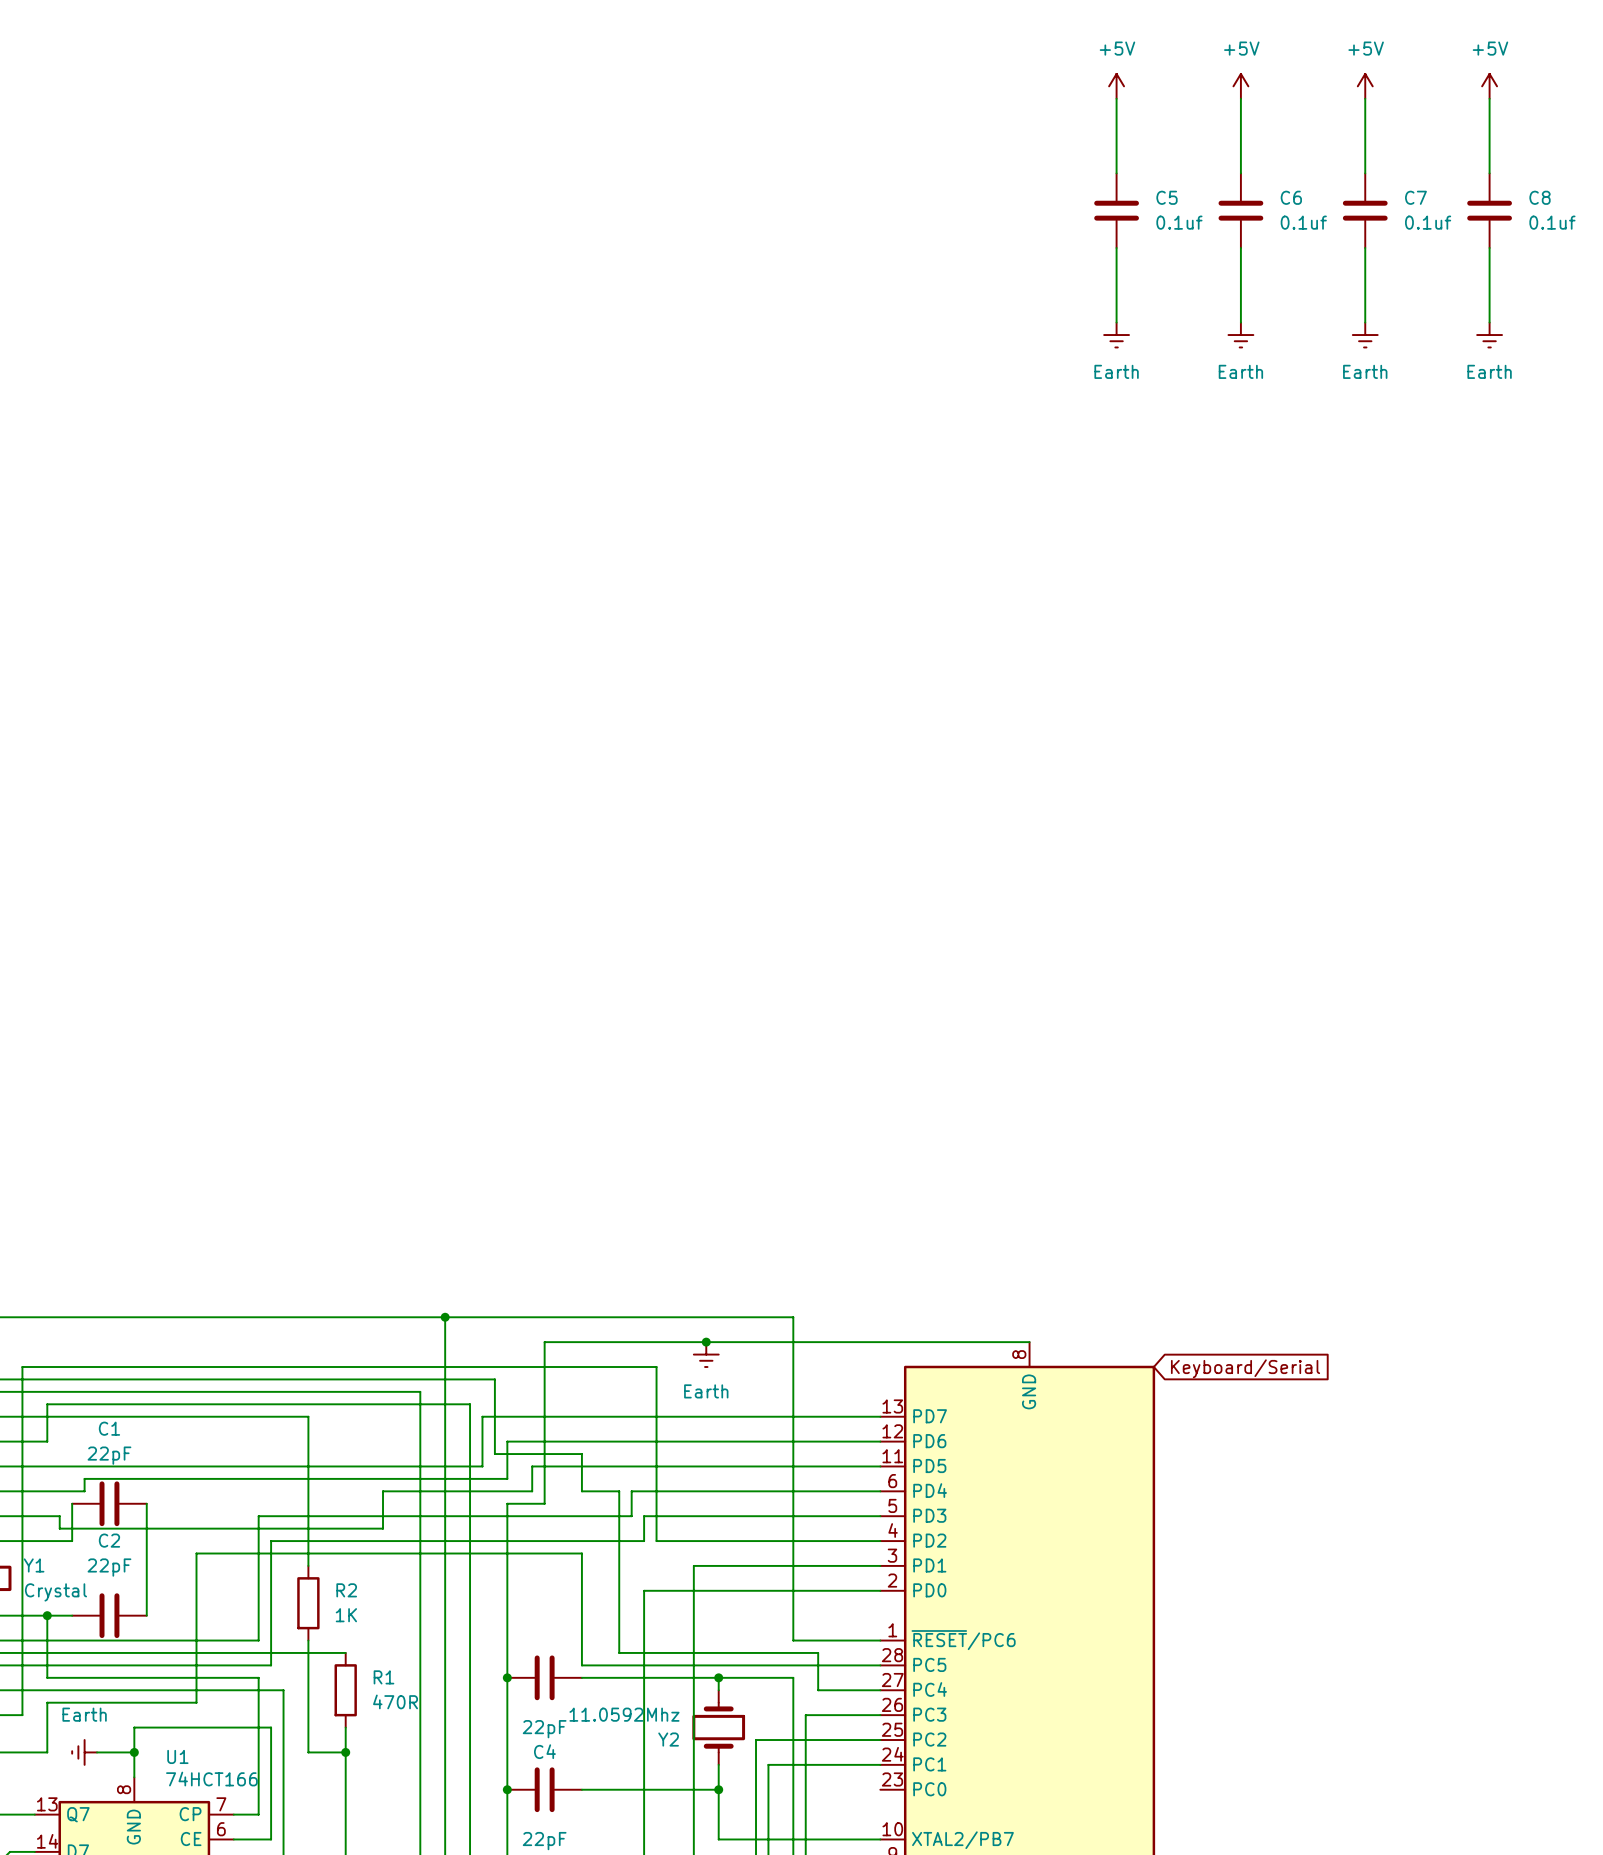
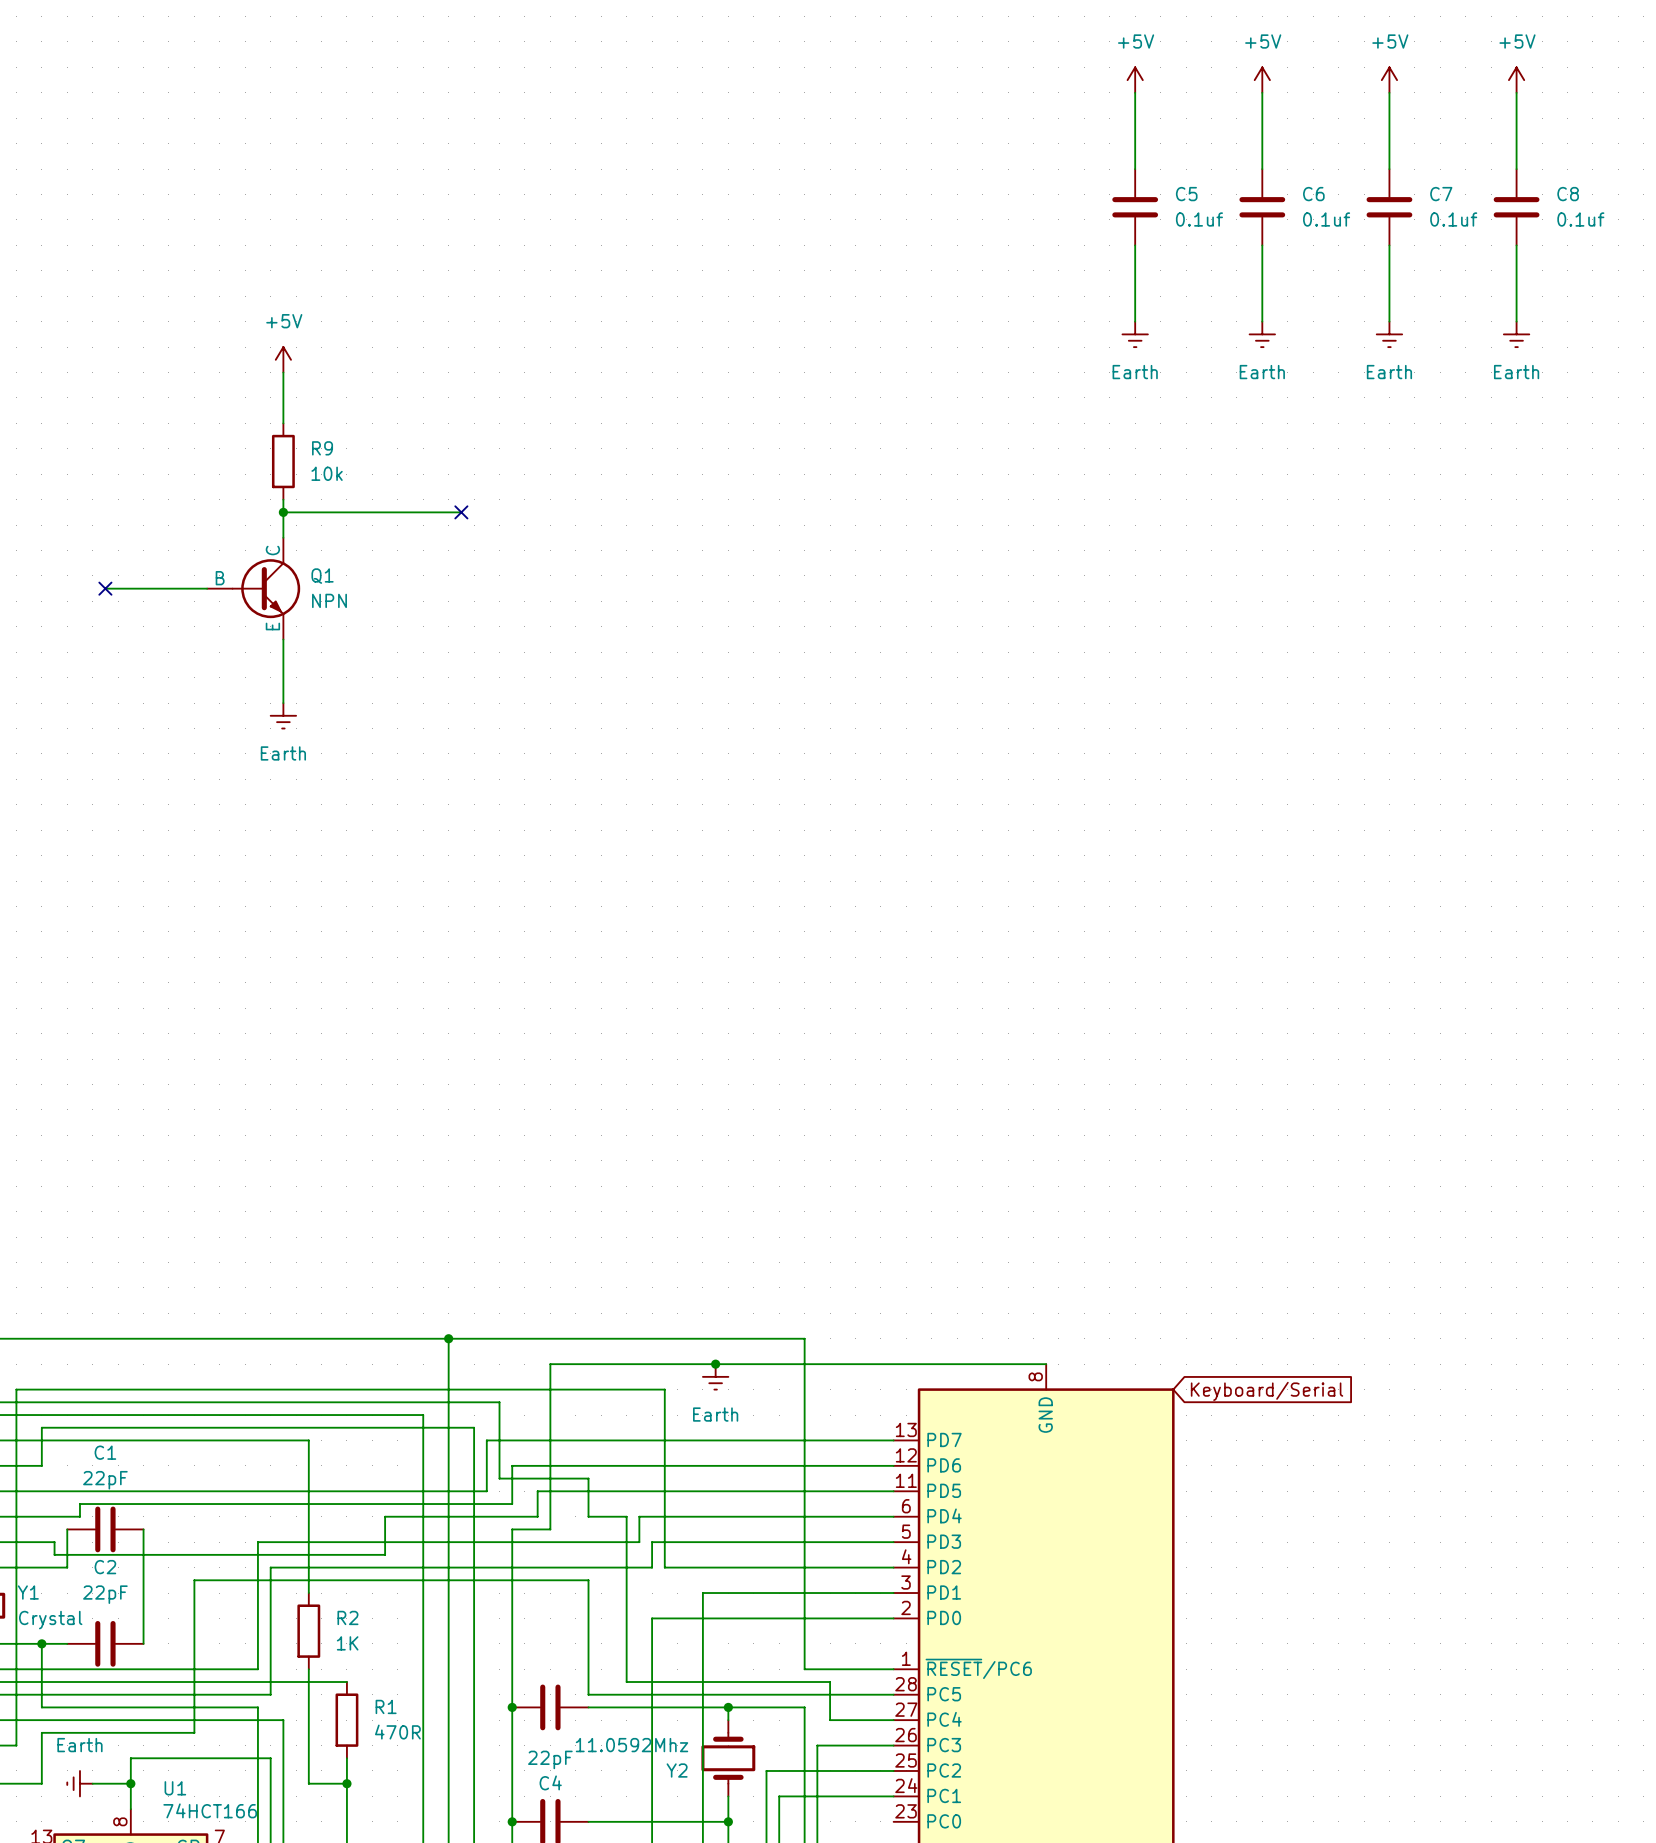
power symbol: none -> +5V (283, 359)
wire: none -> (283, 372) (283, 423)
R9: none -> 10k (283, 461)
wire: none -> (283, 499) (283, 537)
wire: none -> (283, 512) (461, 512)
junction: none -> (283, 512)
no-connect mark: none -> (461, 512)
wire: none -> (105, 588) (207, 588)
no-connect mark: none -> (105, 588)
Q1: none -> NPN (253, 588)
wire: none -> (283, 639) (283, 703)
power symbol: none -> Earth (283, 715)

